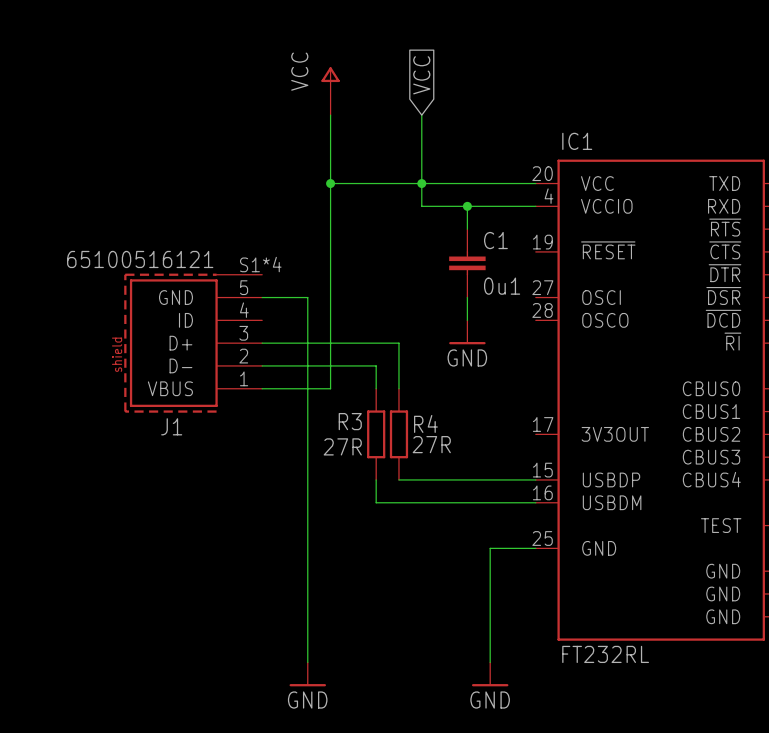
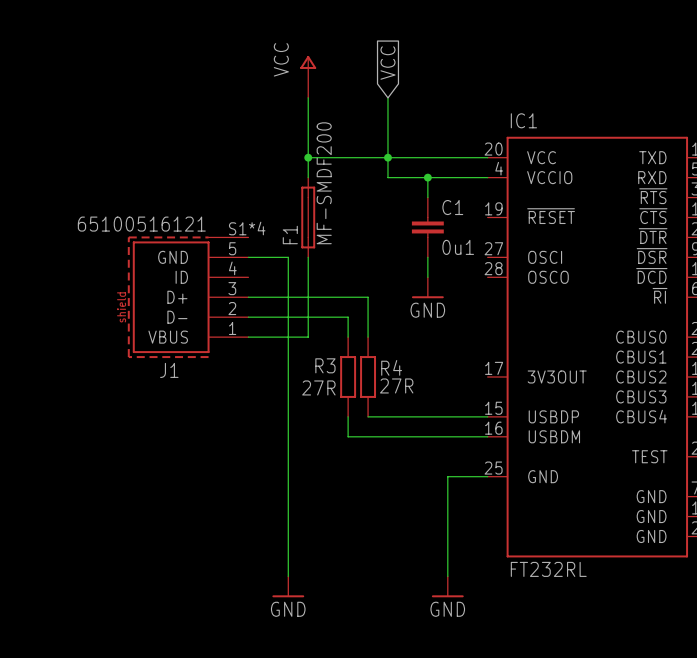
F1: none -> MF-SMDF200 (308, 217)

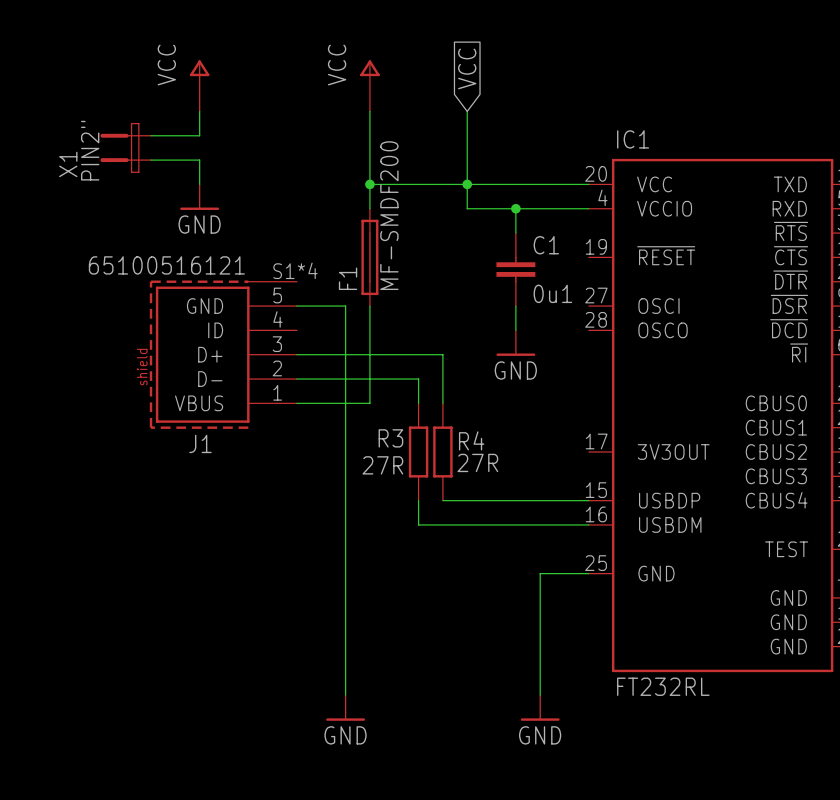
power symbol: none -> VCC (199, 85)
wire: none -> (199, 111) (199, 135) (151, 135)
X1: none -> PIN2" (125, 147)
wire: none -> (151, 160) (199, 160) (199, 184)
power symbol: none -> GND (199, 197)

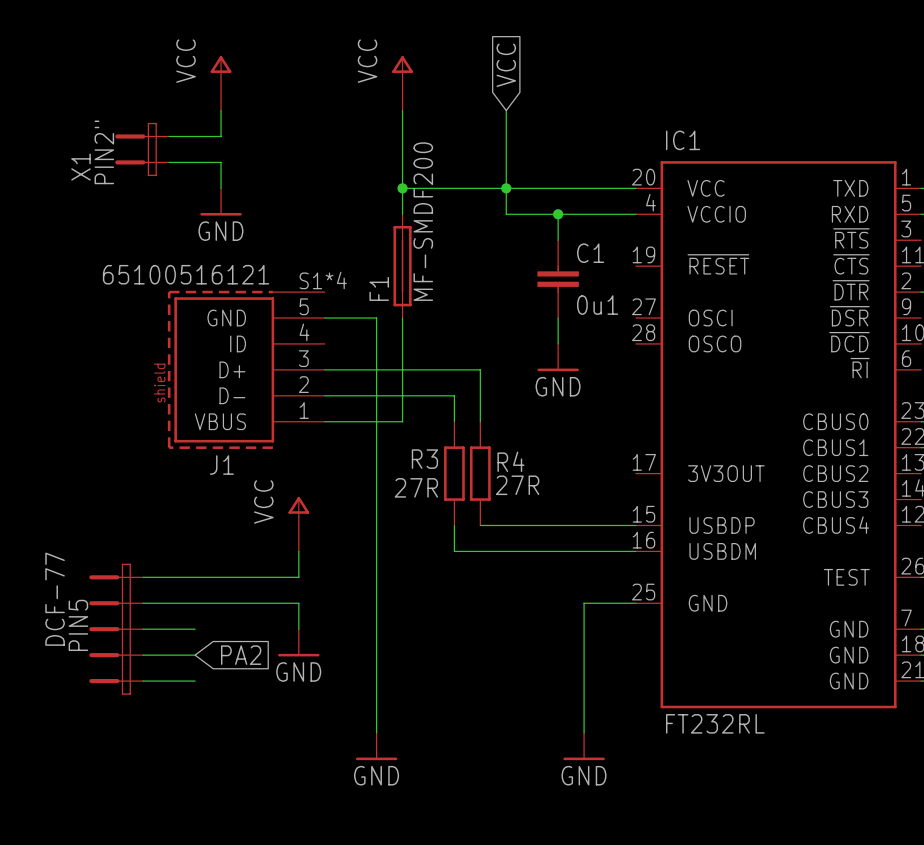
power symbol: none -> VCC (298, 524)
wire: none -> (298, 551) (298, 577) (143, 577)
wire: none -> (143, 603) (298, 603) (298, 629)
DCF-77: none -> PIN5 (116, 629)
wire: none -> (143, 629) (195, 629)
power symbol: none -> GND (298, 642)
wire: none -> (143, 655) (195, 655)
global label: none -> PA2 (241, 655)
wire: none -> (143, 681) (195, 681)

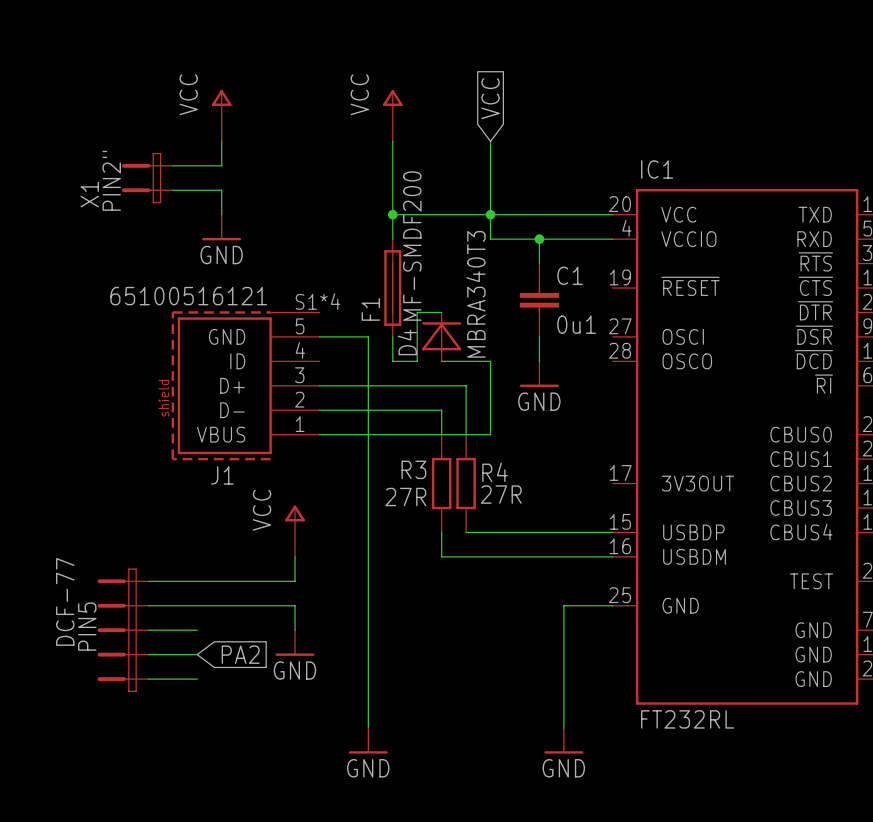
wire: none -> (441, 312) (417, 312) (417, 361) (392, 361)
D4: none -> MBRA340T3 (441, 336)
wire: (402, 343) (402, 421) -> (441, 361) (490, 361) (490, 434) (392, 434)

